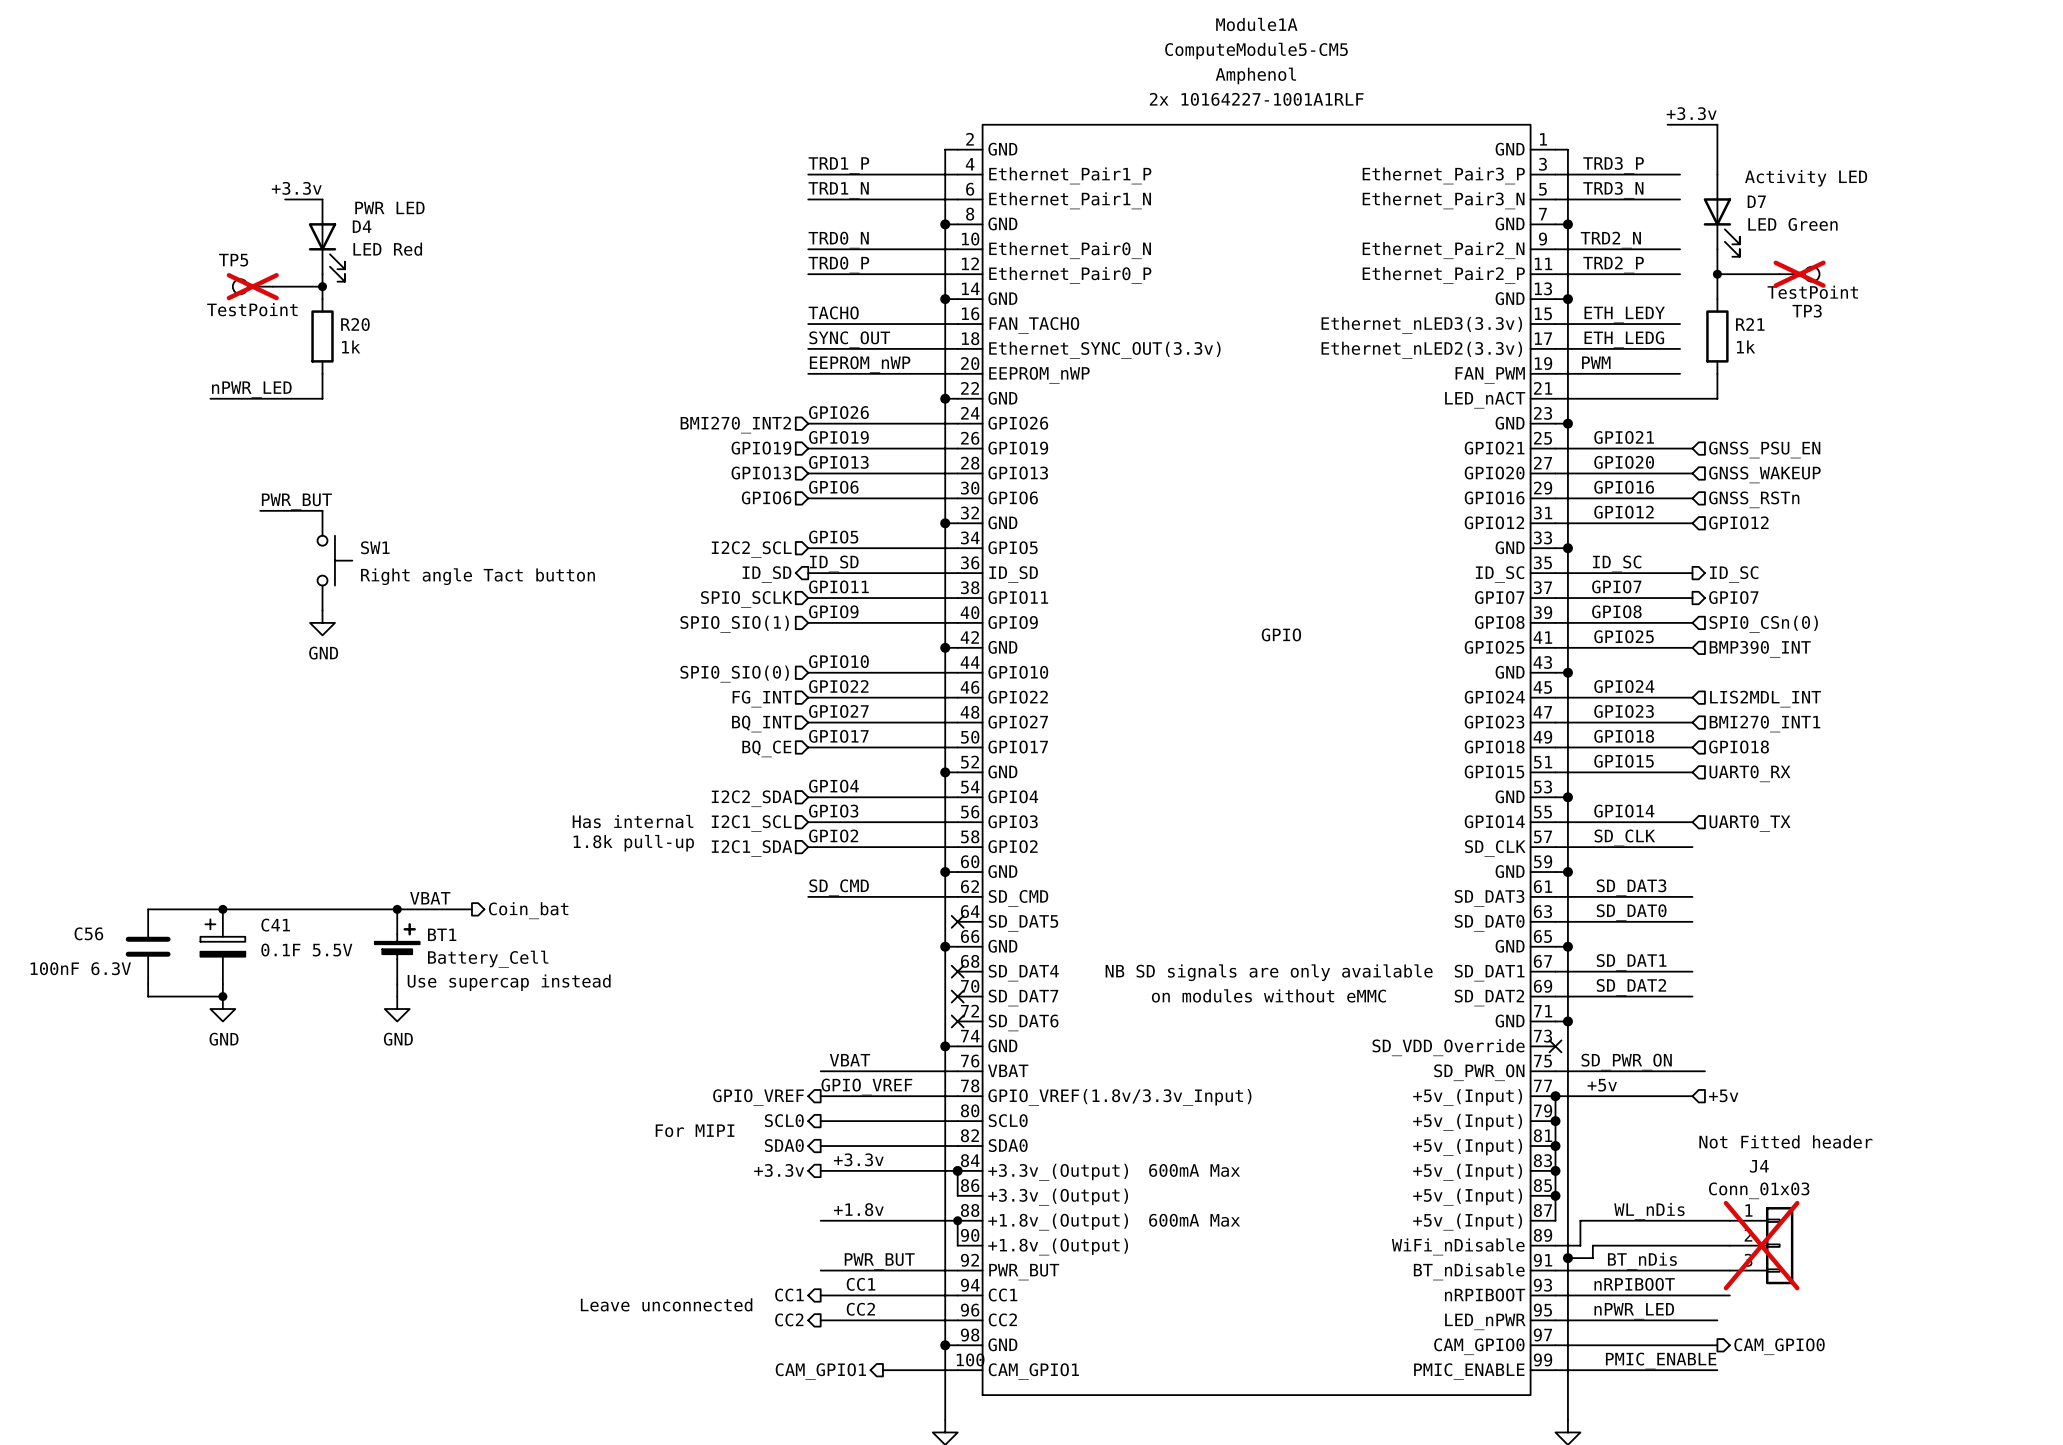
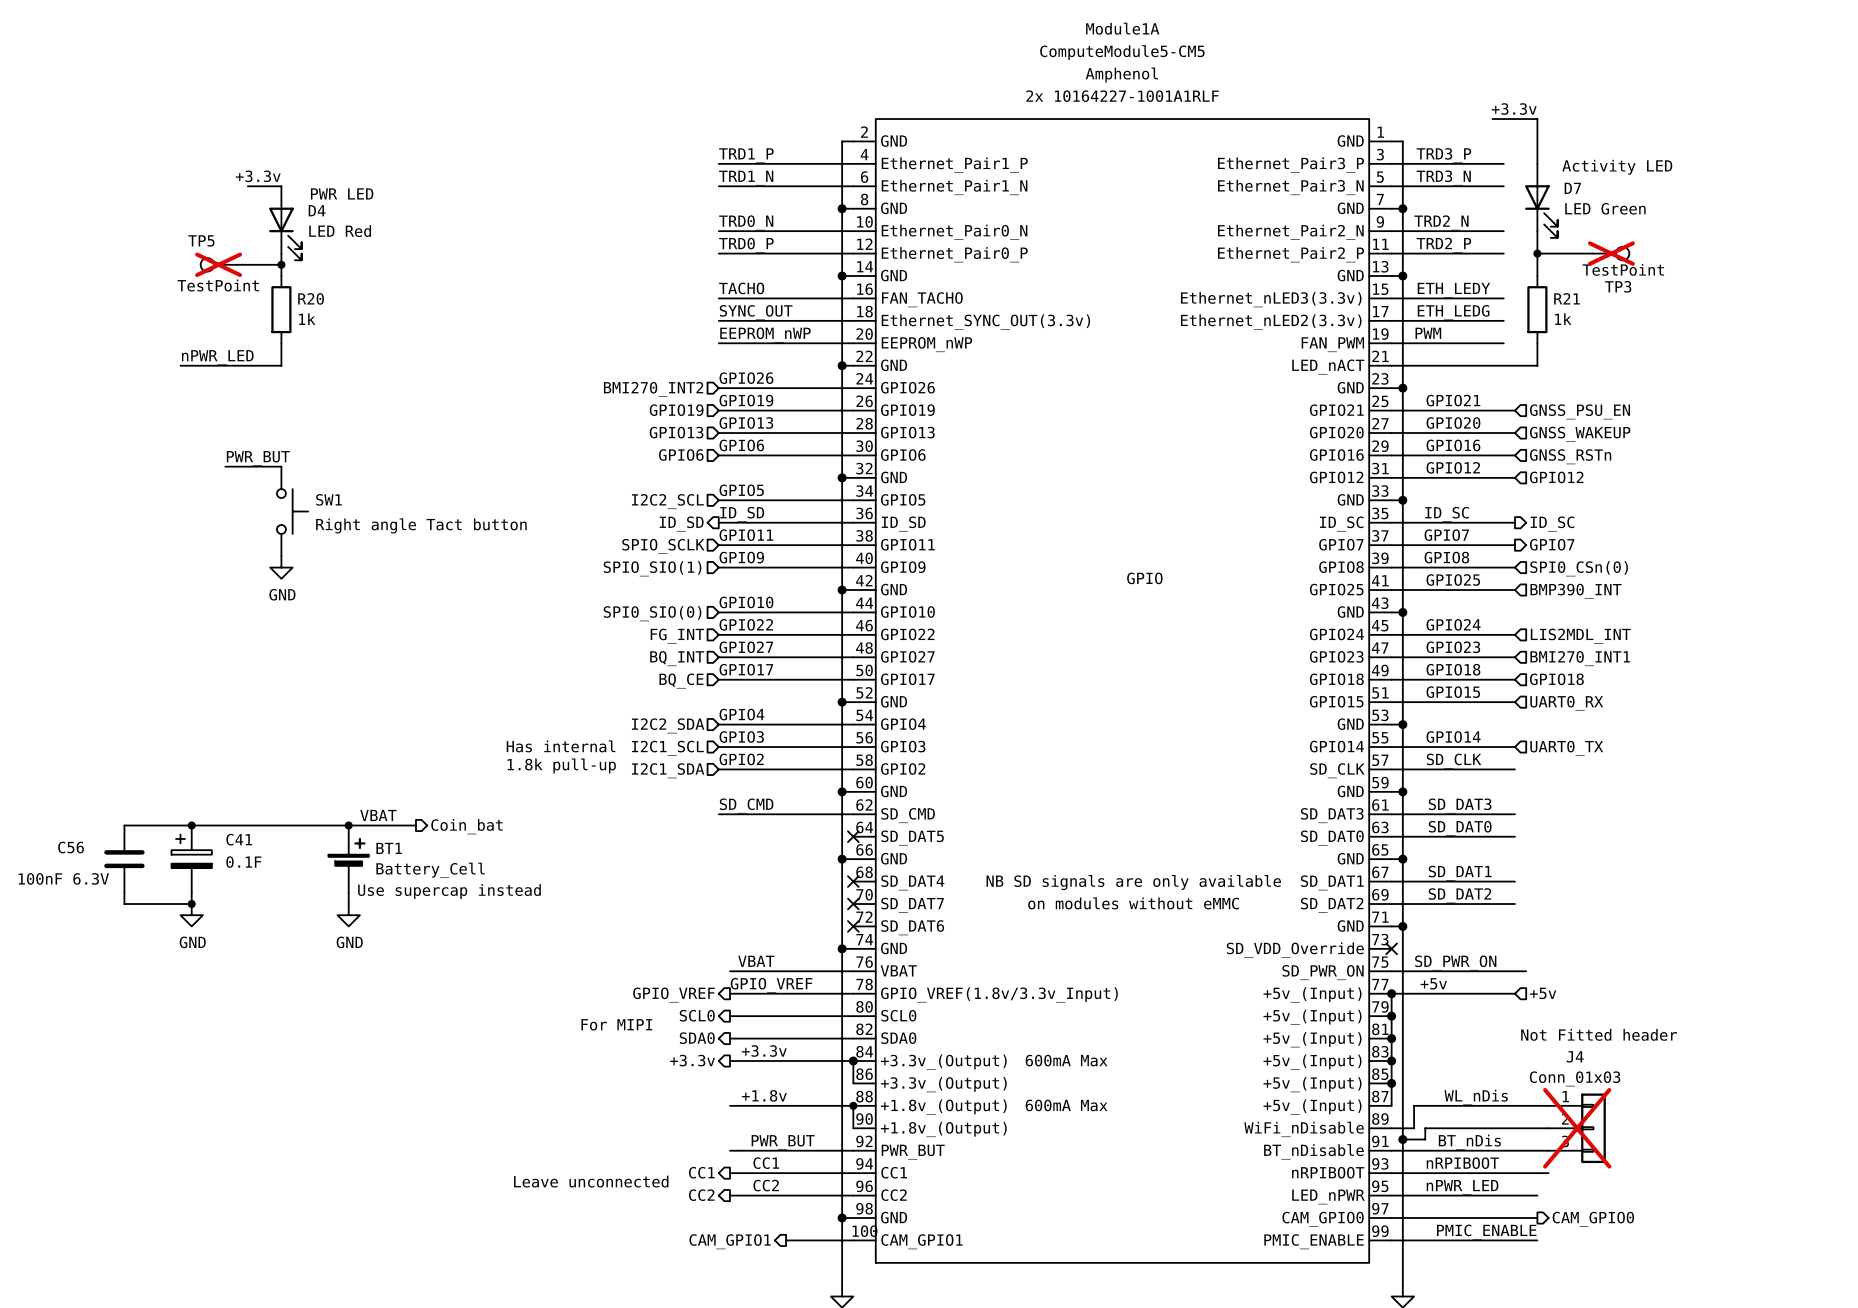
C41 value: 0.1F 5.5V (306, 950) -> 0.1F (243, 862)

